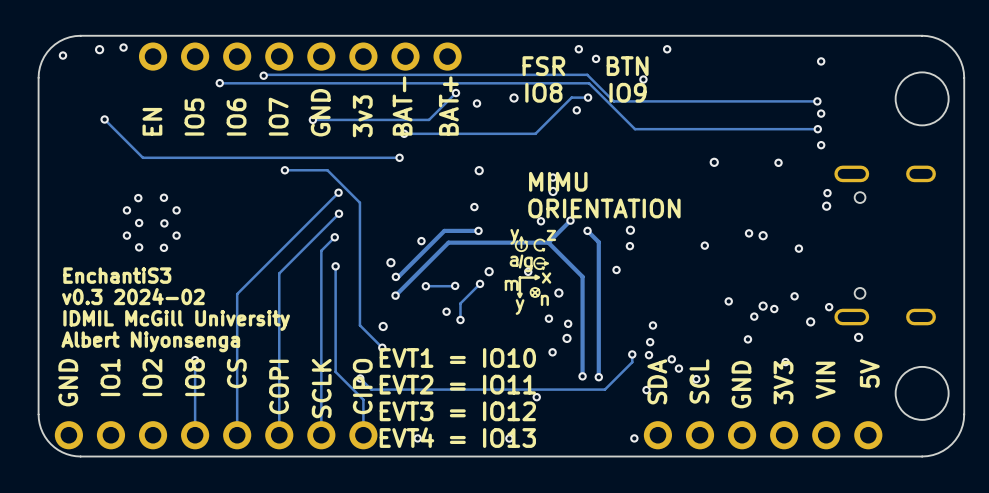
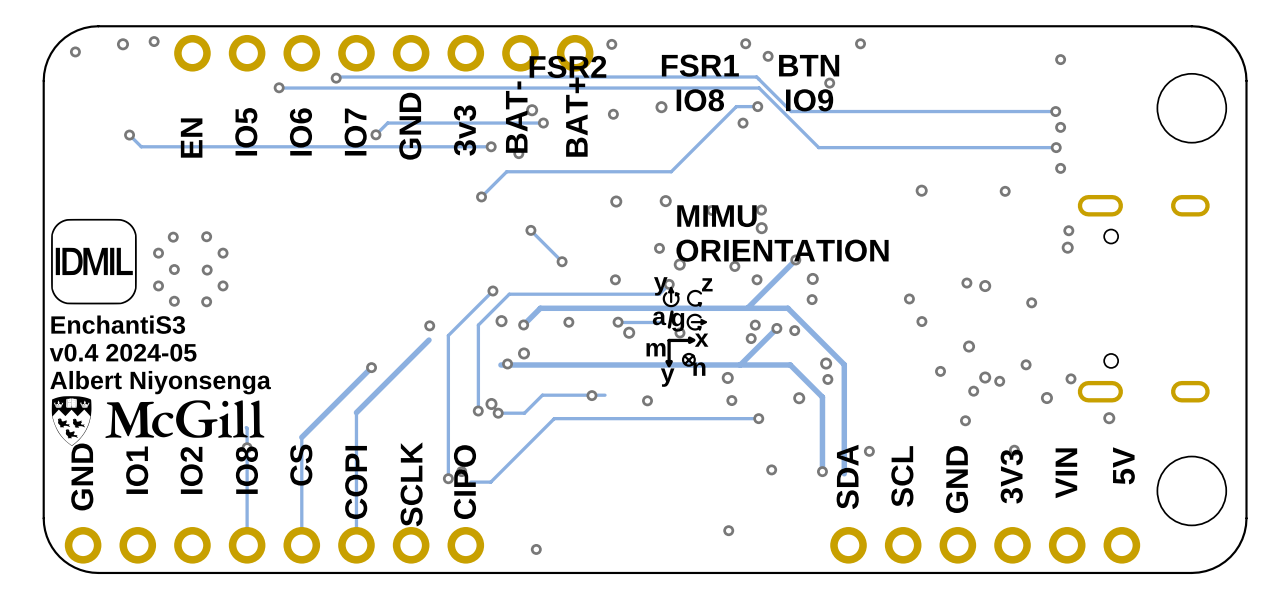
via: none -> (611, 44)
text: FSR (543, 66) -> FSR1 (700, 65)
text: none -> FSR2 (567, 66)
track: (455, 92) (429, 119) (312, 119) -> none
via: (455, 92) -> none
via: none -> (532, 110)
track: none -> (543, 123) (387, 123) (375, 134)
via: none -> (543, 123)
via position: (312, 119) -> (375, 134)
track: (113, 128) (142, 157) (399, 157) -> (141, 146) (491, 146)
via: none -> (491, 146)
track: (535, 133) (404, 133) -> (689, 153) (671, 171) (506, 171) (481, 196)
via: (399, 157) -> none
via: none -> (481, 196)
track: (284, 170) (327, 170) (359, 202) (359, 325) (382, 347) -> none
via: (284, 170) -> none
via: none -> (665, 201)
via: none -> (761, 210)
drawing: none -> [51, 218, 137, 305]
via: (553, 191) -> none
via: none -> (761, 228)
track: (338, 192) (237, 294) (237, 352) -> (371, 367) (301, 437)
via: (338, 192) -> none
track: none -> (530, 230) (562, 261)
via: none -> (530, 230)
via: none -> (659, 248)
via: (474, 207) -> none
track: (338, 213) (279, 273) (279, 333) -> (429, 340) (356, 412)
via: (338, 213) -> none
track: none -> (795, 259) (747, 308)
via: none -> (795, 259)
via: none -> (562, 261)
via: none -> (679, 264)
track: (570, 220) (548, 242) -> none
via: (540, 221) -> none
track: (478, 230) (444, 230) (398, 276) (395, 276) -> none
track: (587, 230) (598, 242) (598, 377) -> none
track: none -> (669, 284) (659, 294) (509, 294) (478, 325) (478, 410)
via: none -> (669, 284)
track: (334, 237) (321, 250) (321, 435) -> none
via: (334, 237) -> none
track: none -> (492, 291) (448, 335) (448, 478)
via: none -> (492, 291)
via: (421, 241) -> none
track: (548, 242) (582, 276) (582, 376) -> none
track: (548, 242) (448, 242) (395, 295) -> none
via: none -> (568, 322)
via: none -> (618, 322)
track: none -> (662, 322) (618, 322)
via: none -> (921, 321)
track: none -> (523, 324) (540, 308) (787, 308) (844, 364) (844, 473)
via: none -> (523, 324)
via: none -> (755, 325)
track: (335, 266) (335, 371) (363, 399) (363, 435) -> none
track: none -> (776, 328) (740, 364)
via: none -> (776, 328)
text position: EnchantiS3 (117, 275) -> EnchantiS3 (118, 324)
via: (395, 276) -> none
via: none -> (751, 338)
via: none -> (969, 346)
track: (480, 283) (460, 303) (460, 320) -> none
via: (480, 283) -> none
track: (455, 285) (425, 286) -> none
via: (455, 285) -> none
via: (425, 286) -> none
via: none -> (524, 353)
via position: (558, 293) -> (727, 377)
via: none -> (826, 363)
text: v0.3 2024-02 (133, 296) -> v0.4 2024-05 (123, 352)
track: none -> (500, 364) (790, 364) (822, 397) (822, 471)
via: none -> (371, 367)
via: none -> (827, 379)
via: (446, 311) -> none
via: (548, 318) -> none
track: none -> (605, 395) (542, 395) (524, 413) (498, 413)
drawing: none -> [51, 396, 265, 446]
text: IDMIL McGill University (176, 320) -> none
via: none -> (799, 398)
via: none -> (647, 400)
via: (652, 325) -> none
via: none -> (478, 411)
via: none -> (498, 413)
track: none -> (758, 418) (554, 418) (490, 482) (470, 482)
via: none -> (758, 418)
via: (566, 338) -> none
text position: Albert Niyonsenga (150, 341) -> Albert Niyonsenga (160, 382)
via: (650, 342) -> none
track: none -> (246, 427) (247, 447)
via: (382, 347) -> none
via: (552, 352) -> none
track: (632, 354) (632, 362) (604, 389) (371, 389) (360, 378) -> none
via: (632, 354) -> none
via: (648, 355) -> none
text: EVT1 = IO10 (457, 358) -> none
via: (671, 359) -> none
via: none -> (869, 451)
via: (678, 368) -> none
via: (582, 376) -> none
via: none -> (822, 471)
via: (696, 379) -> none
via: none -> (448, 478)
text: EVT2 = IO11 (457, 384) -> none
via: (646, 390) -> none
via: (536, 397) -> none
text: EVT3 = IO12 (457, 411) -> none
via: none -> (728, 530)
text: EVT4 = IO13 (457, 437) -> none
via: (509, 438) -> none
via: (634, 438) -> none

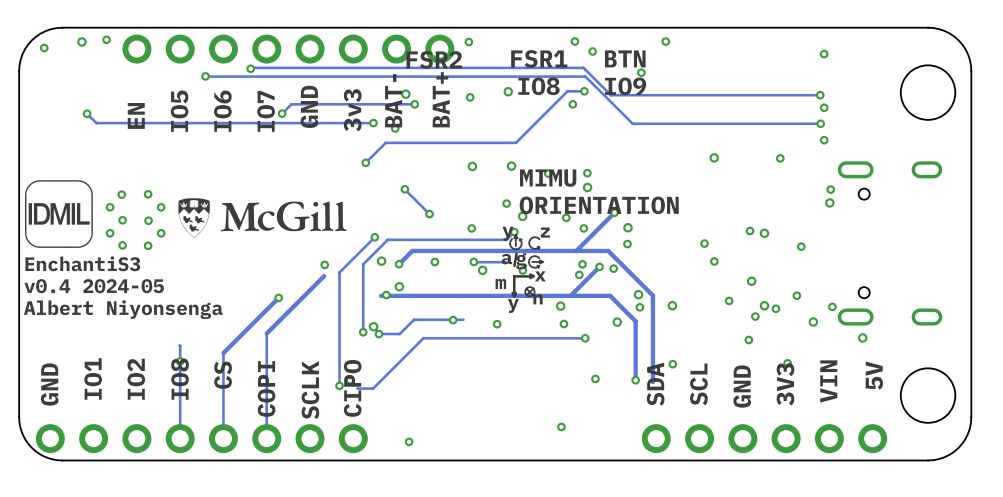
via: none -> (672, 305)
drawing position: (158, 421) -> (262, 217)

